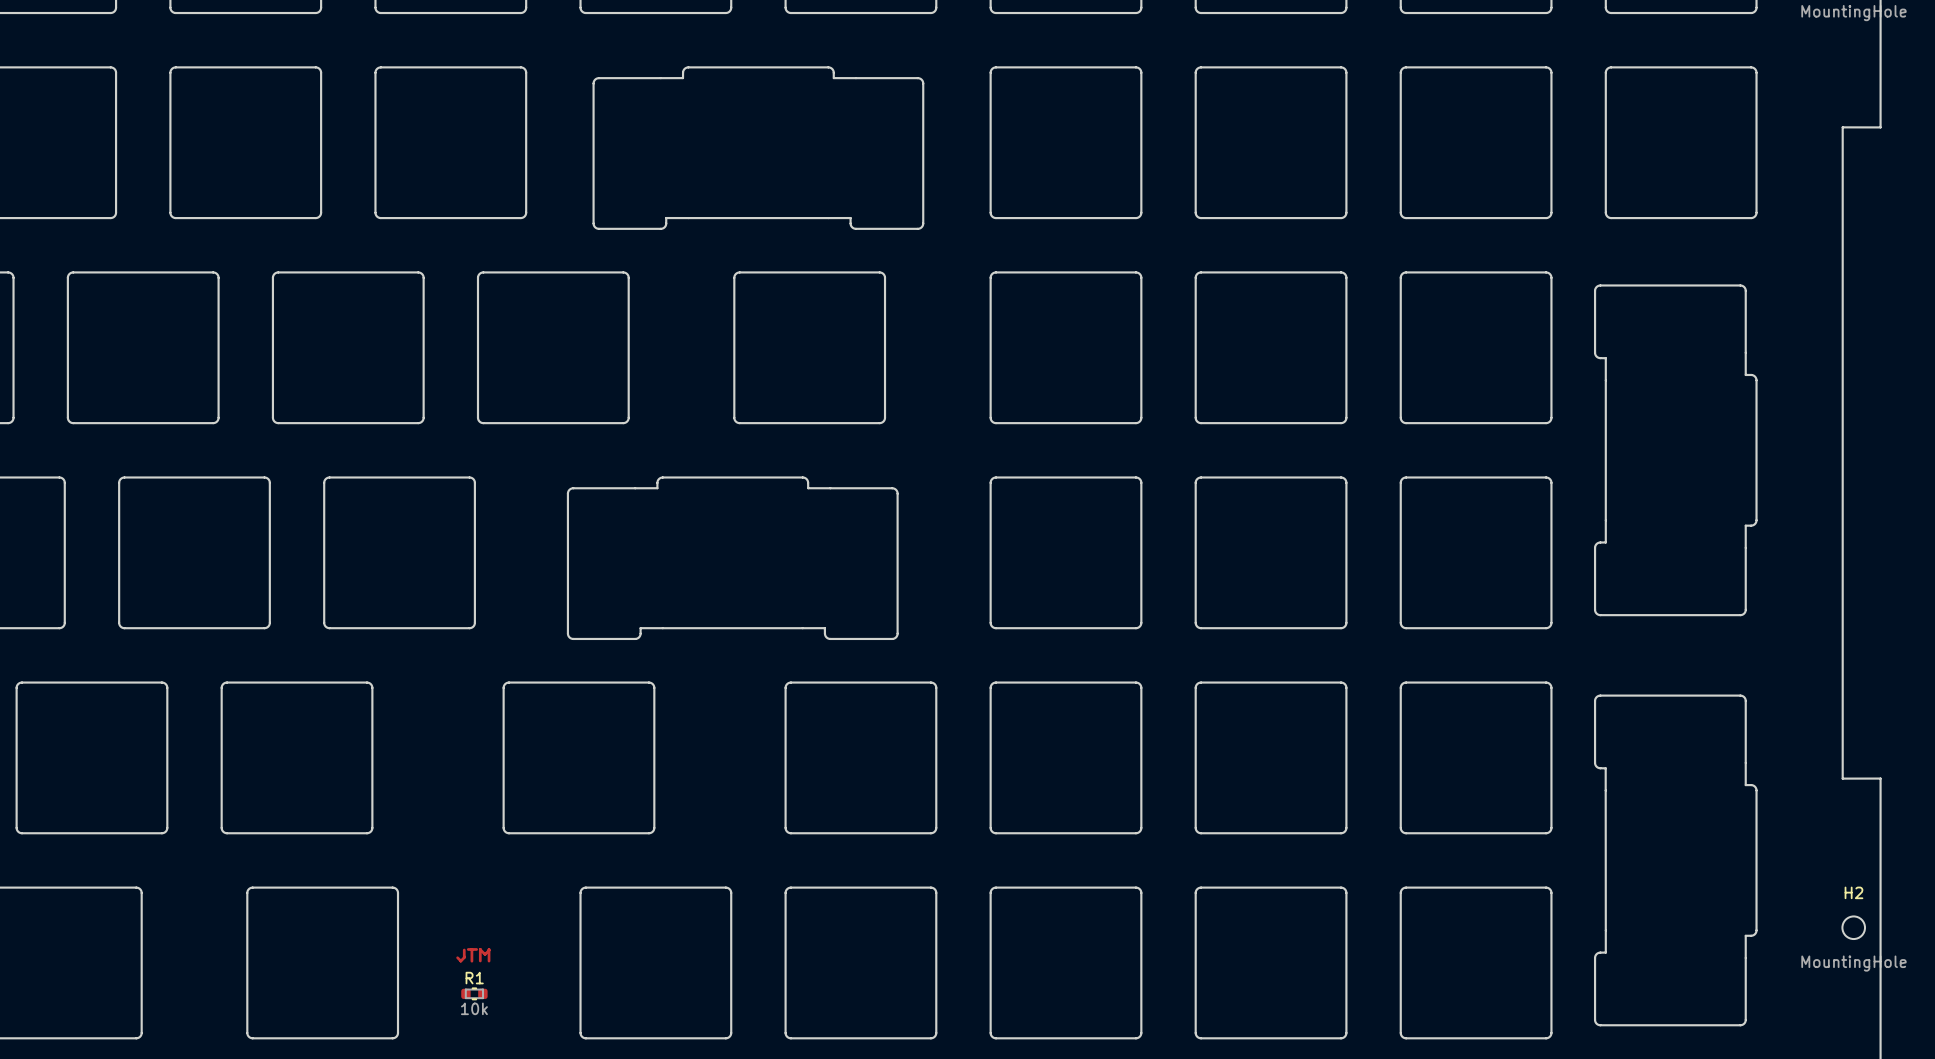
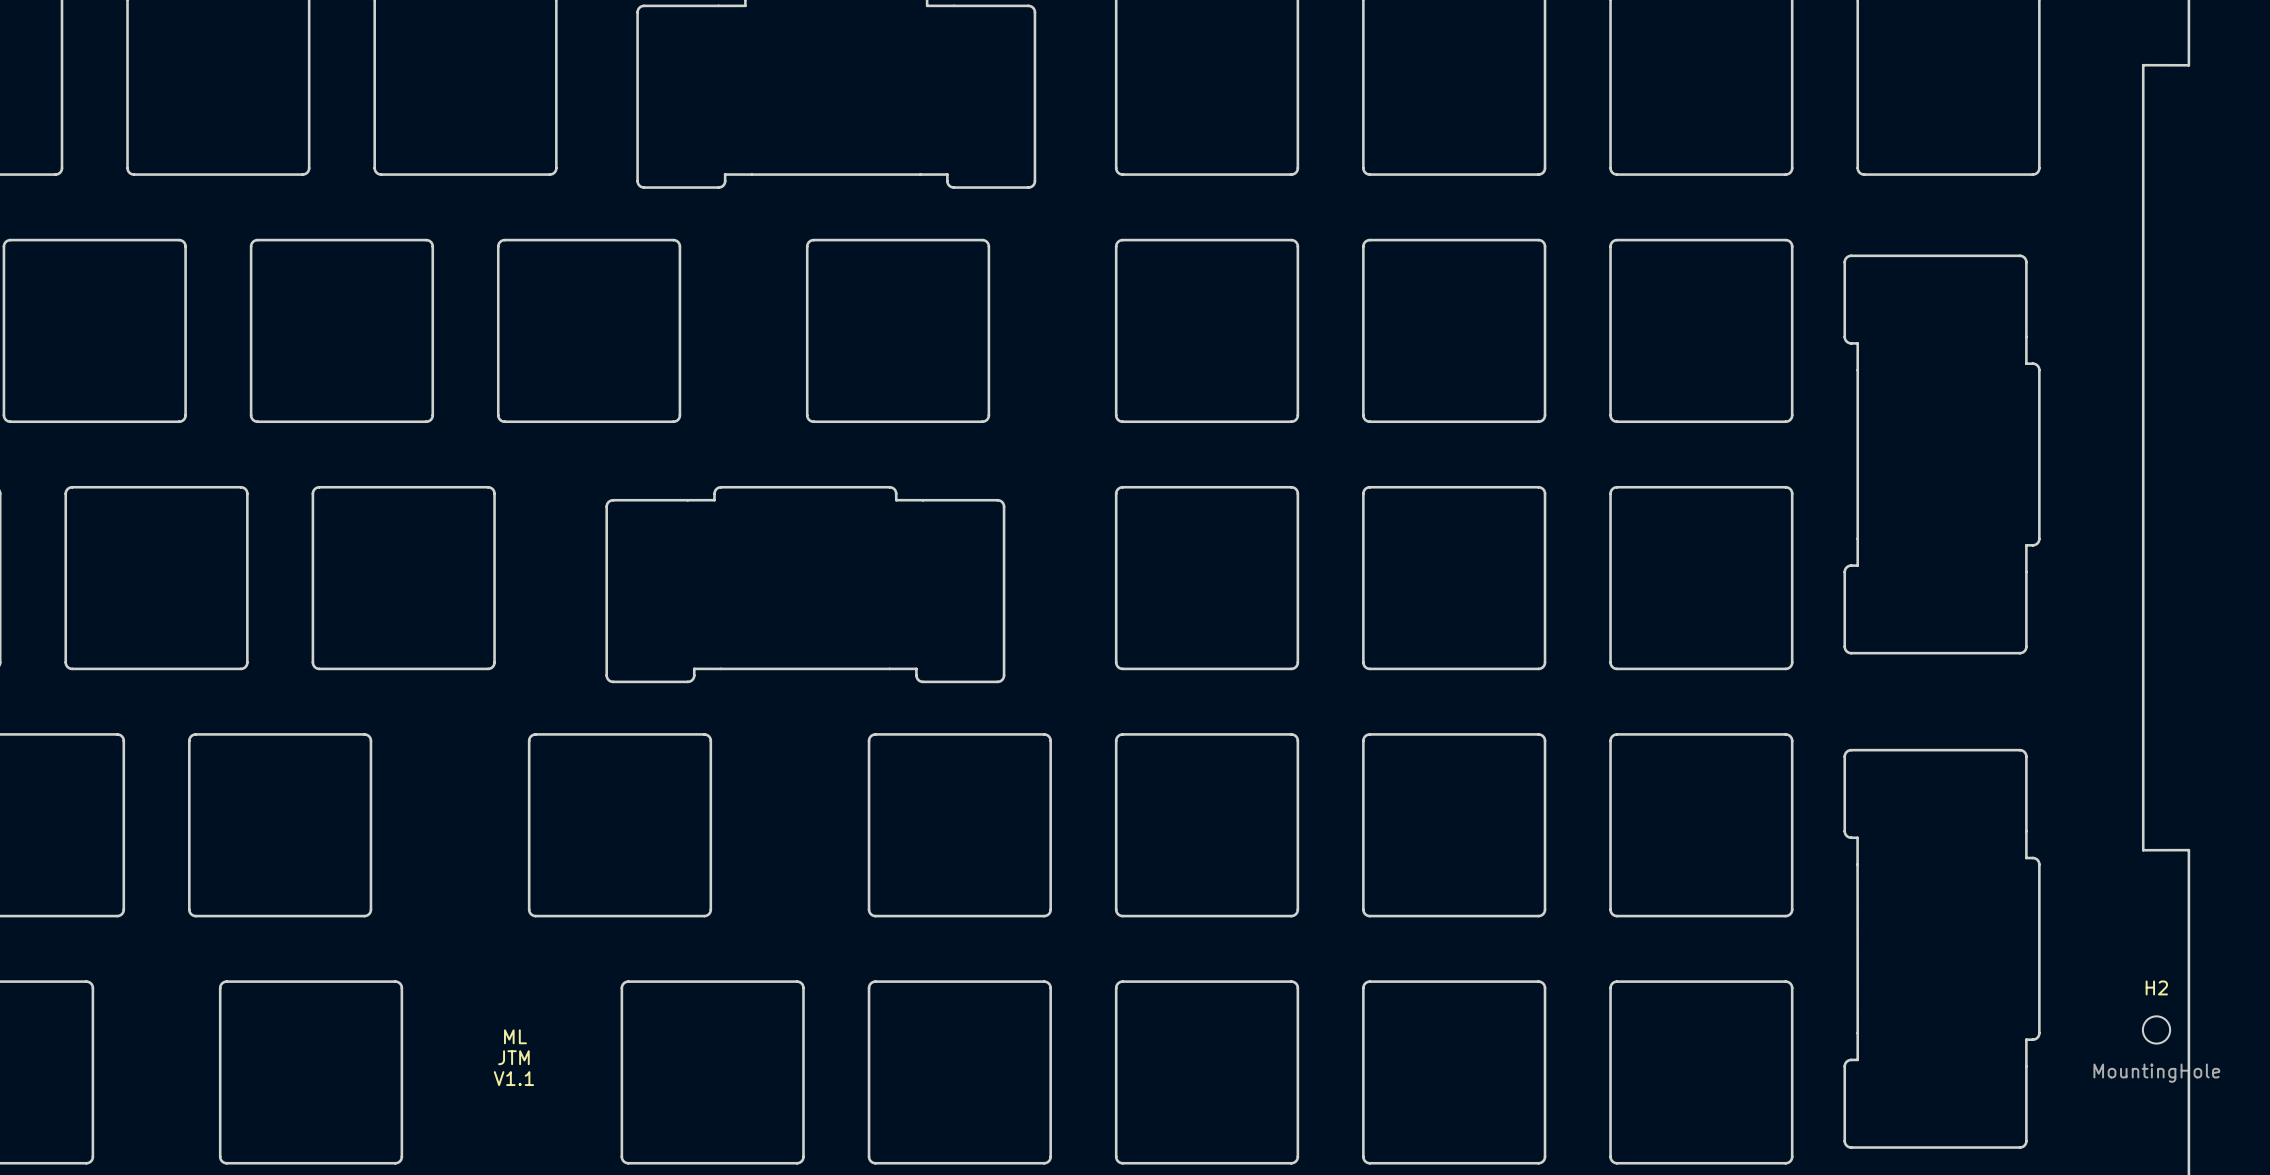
text: none -> ML (515, 1036)
track: (468, 949) (476, 949) -> none
track: (471, 949) (471, 961) -> none
track: (480, 949) (480, 960) -> none
track: (480, 949) (485, 954) (489, 950) -> none
track: (489, 949) (489, 961) -> none
track: (464, 950) (464, 957) (460, 961) -> none
text: none -> JTM (513, 1057)
track: (457, 957) (460, 960) -> none
text: none -> V1.1 (513, 1078)
R1: 10k (474, 993) -> none

